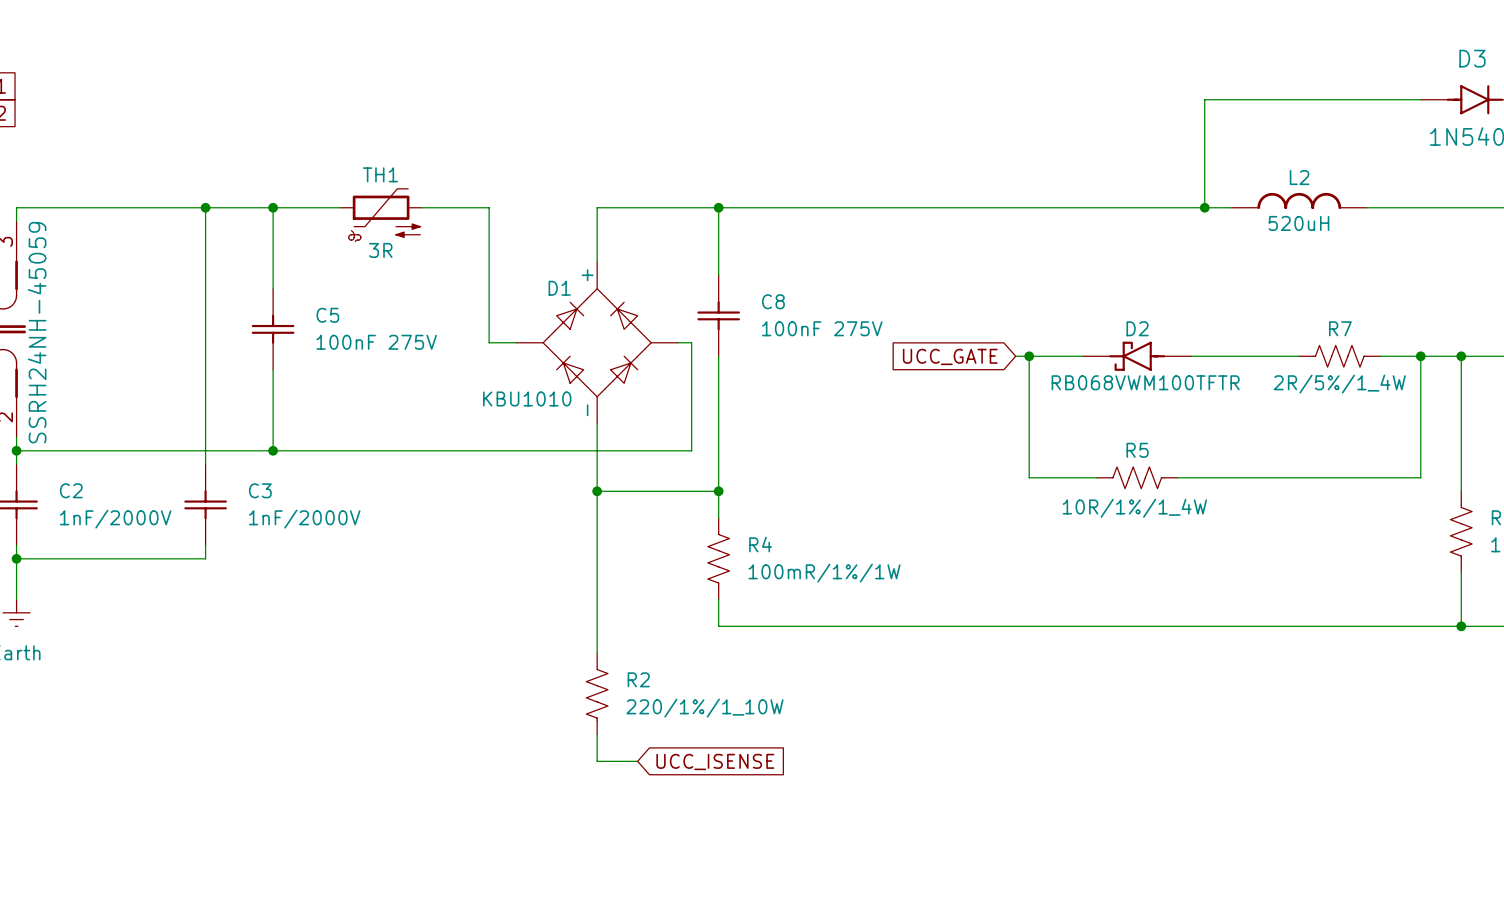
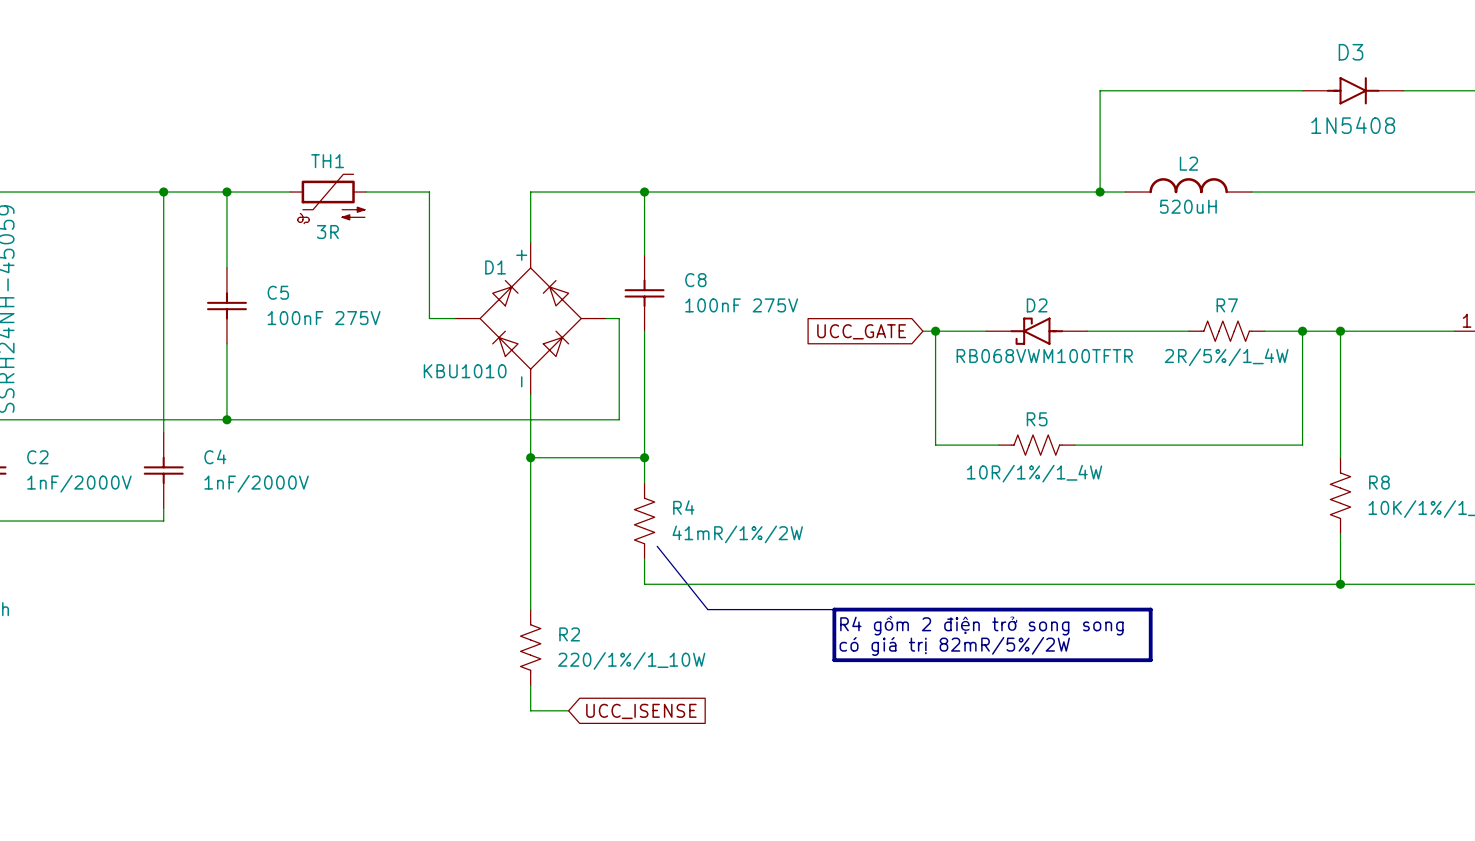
C3 name: C3 (260, 490) -> C4 (215, 456)
R4 value: 100mR/1%/1W (824, 573) -> 41mR/1%/2W (737, 534)
line: none -> (657, 546) (707, 609) (834, 609)
line: none -> (834, 609) (1150, 609) (1150, 660) (834, 660) (834, 609)
text: none -> R4 gồm 2 điện trở song song (981, 625)
text: none -> có giá trị 82mR/5%/2W (954, 646)

